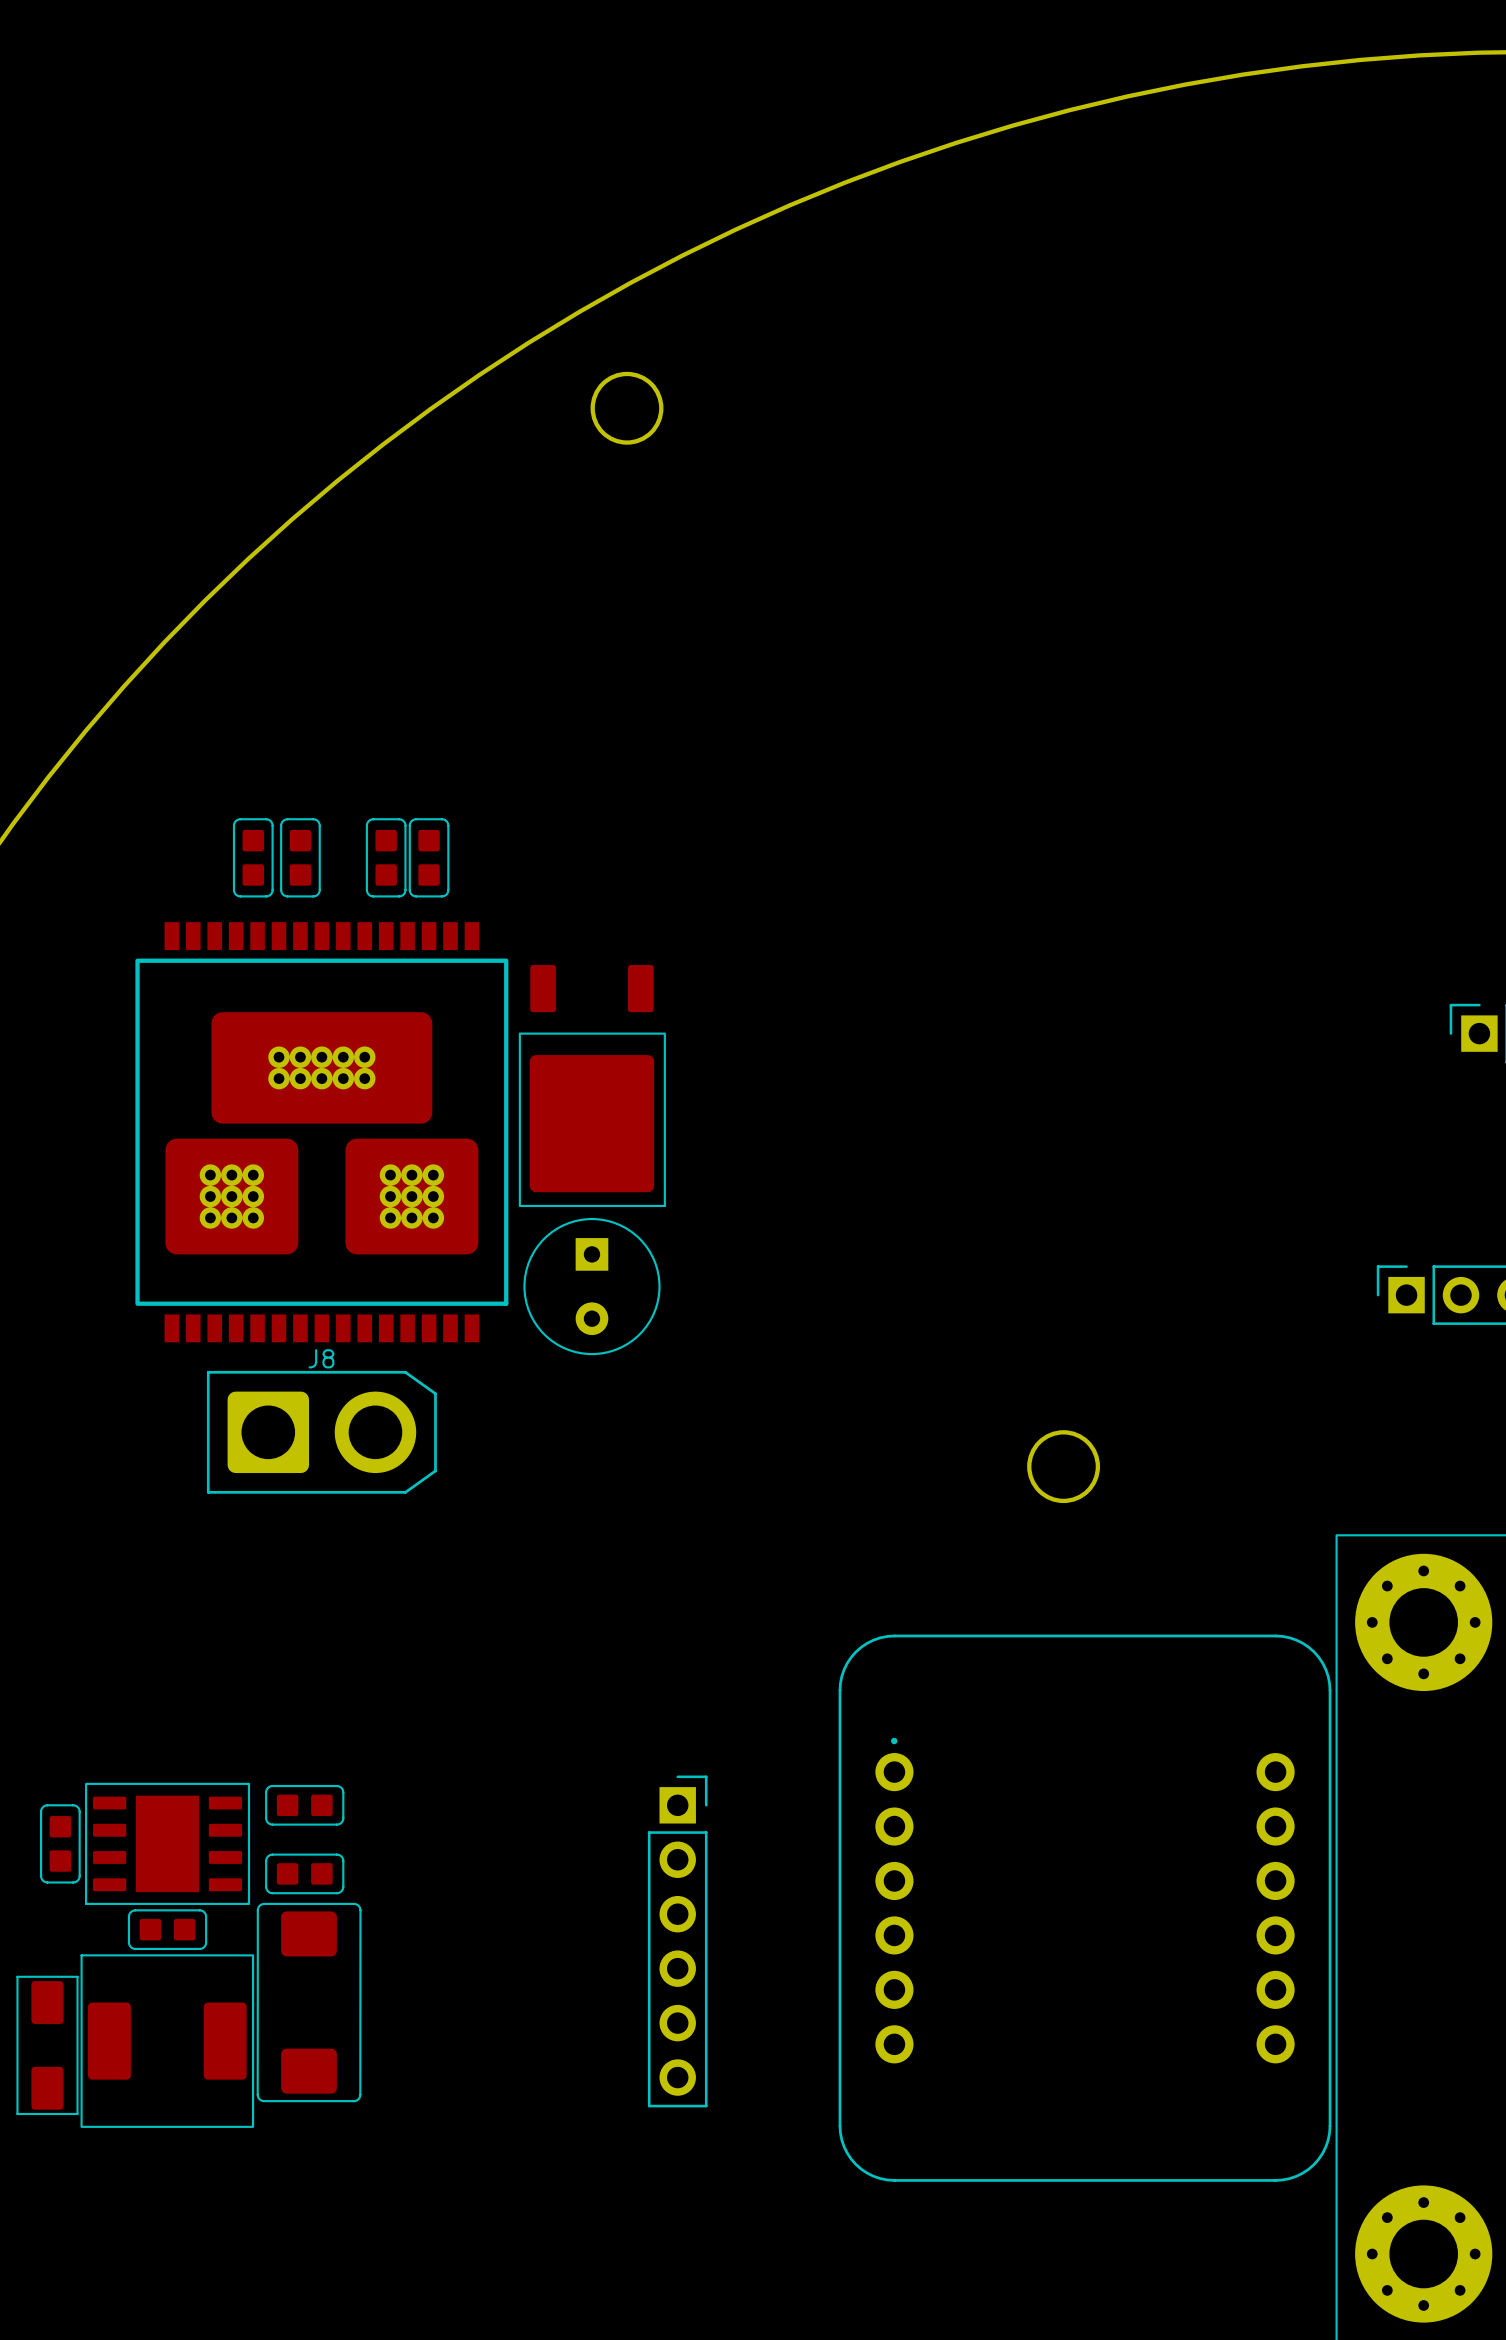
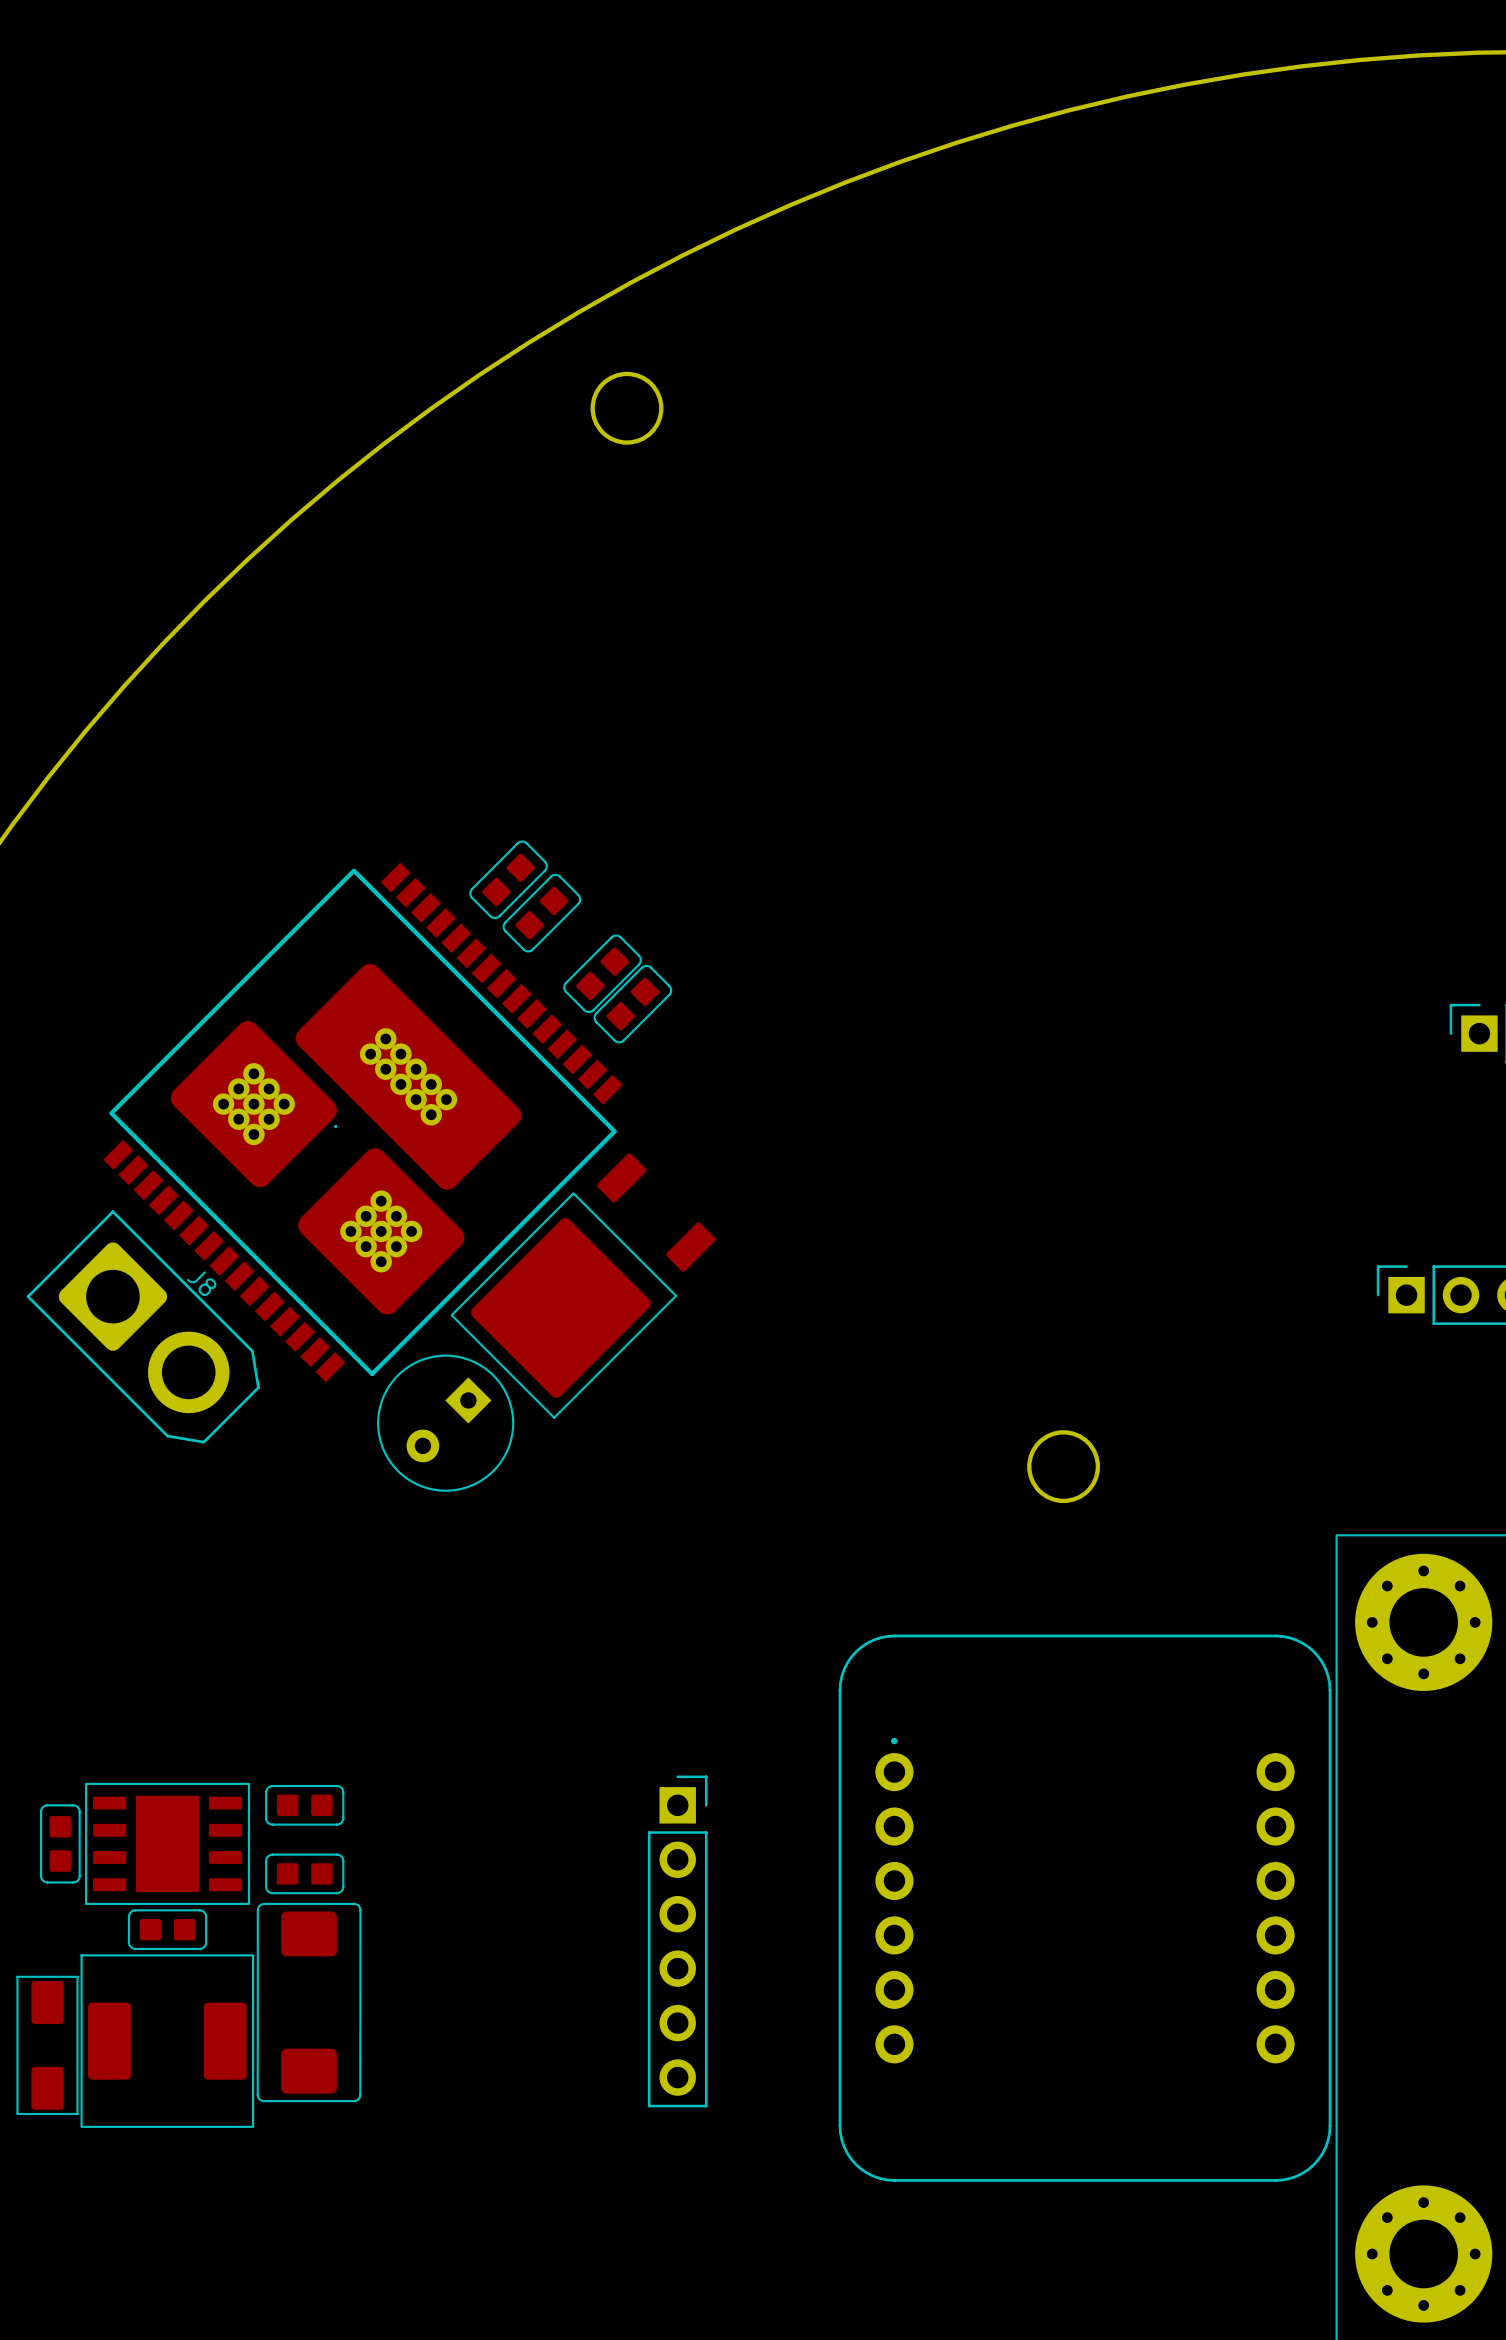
part: (253, 857) -> none
part: (300, 857) -> none
part: (386, 857) -> none
part: (429, 857) -> none
part: none -> (508, 879)
part: none -> (541, 913)
part: none -> (602, 973)
part: none -> (632, 1004)
part: (592, 1086) -> none
part: none -> (363, 1122)
part: (321, 1132) -> none
part footprint: [523, 1217, 661, 1356] -> [450, 1153, 716, 1419]
part: none -> (445, 1423)
J8 rotation: 0° (321, 1432) -> 45° clockwise (143, 1326)
J8 position: (321, 1432) -> (143, 1326)

